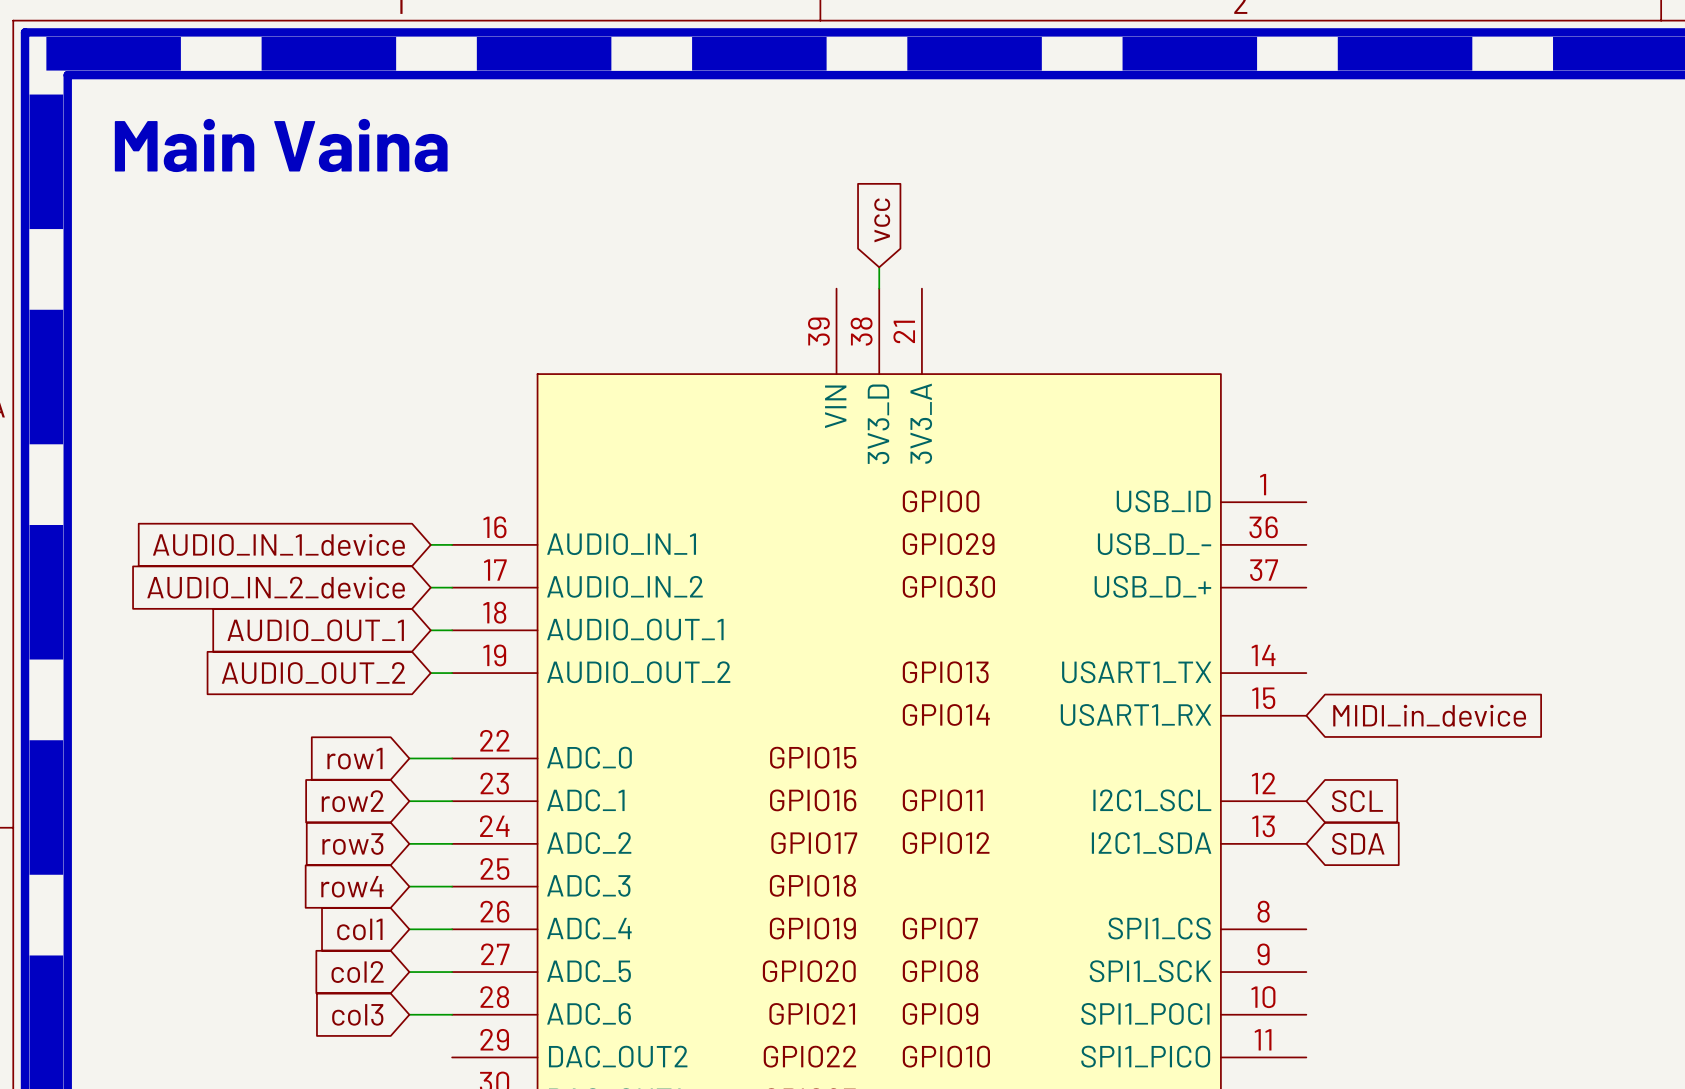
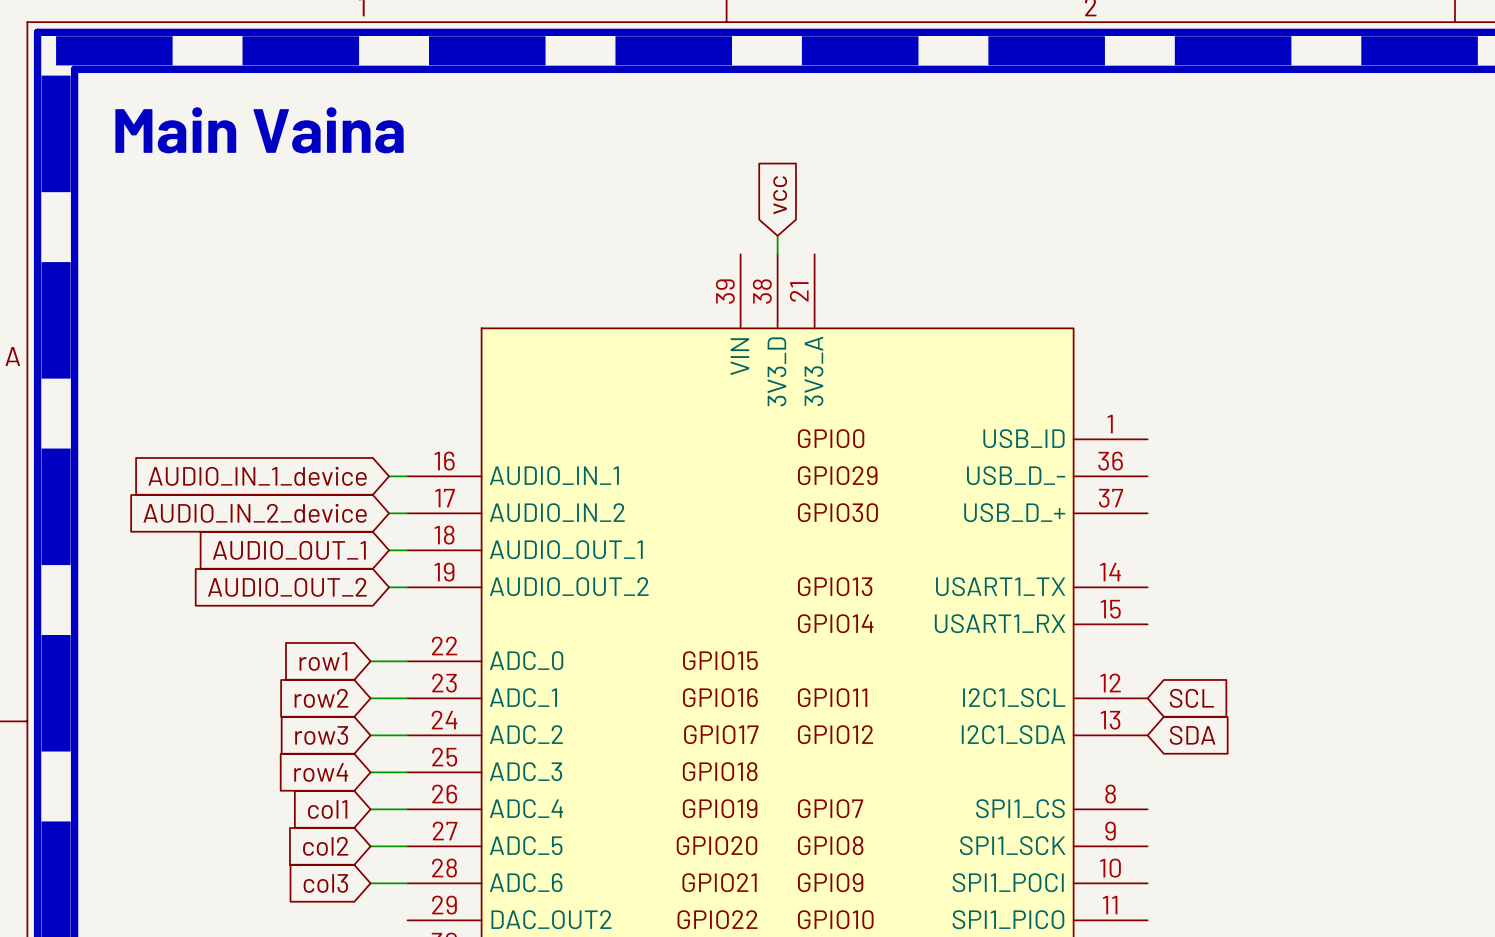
global label: MIDI_in_device (1429, 715) -> none

